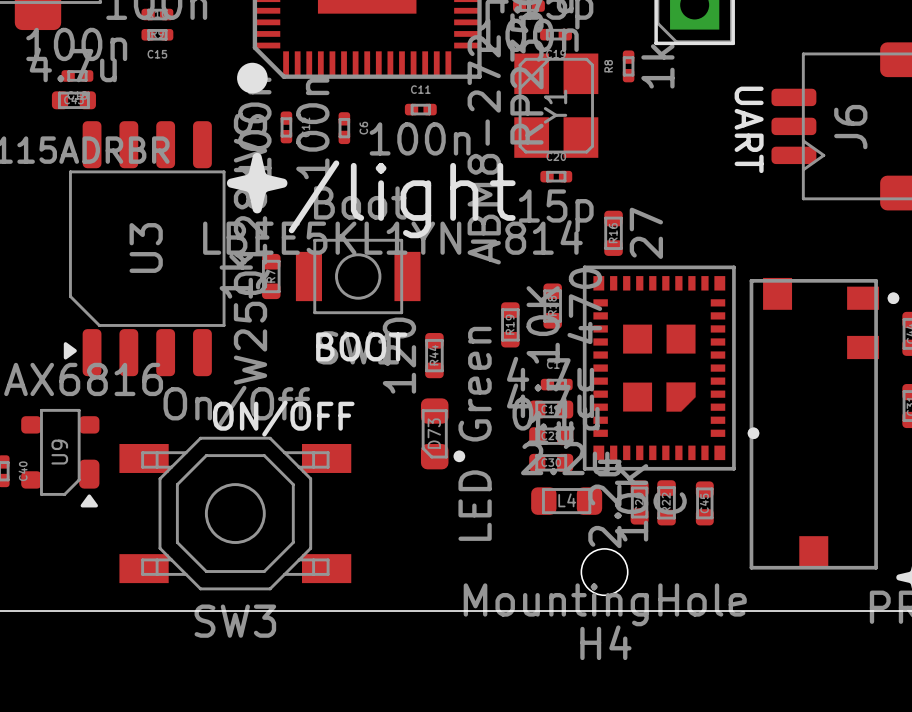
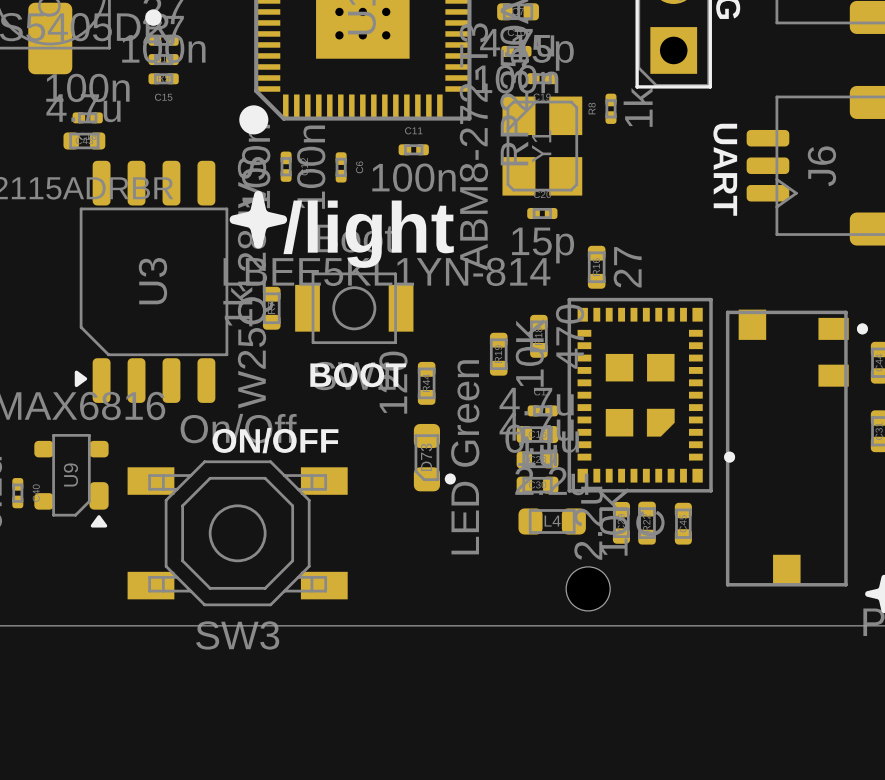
H4 value: MountingHole (605, 604) -> none
H4 name: H4 (605, 642) -> none

